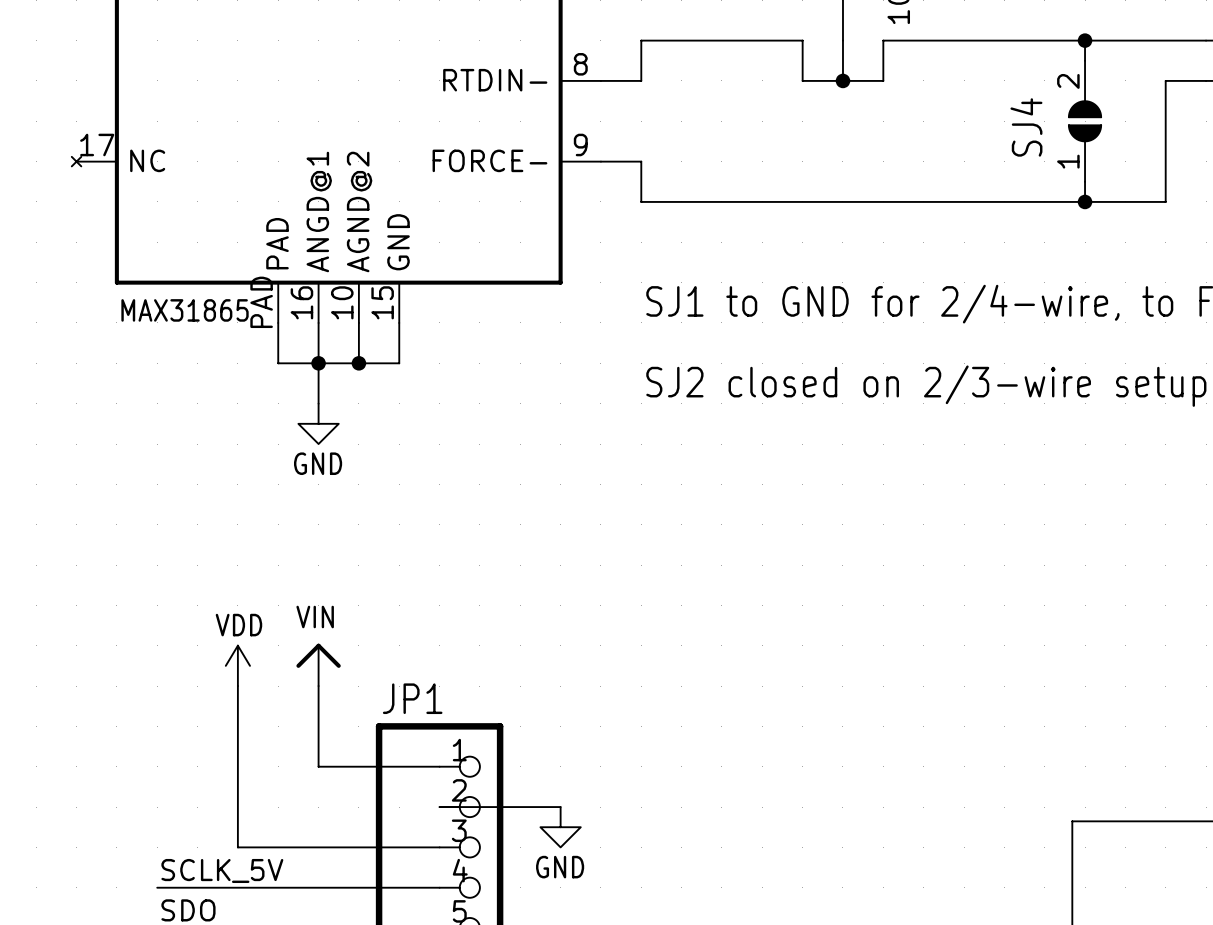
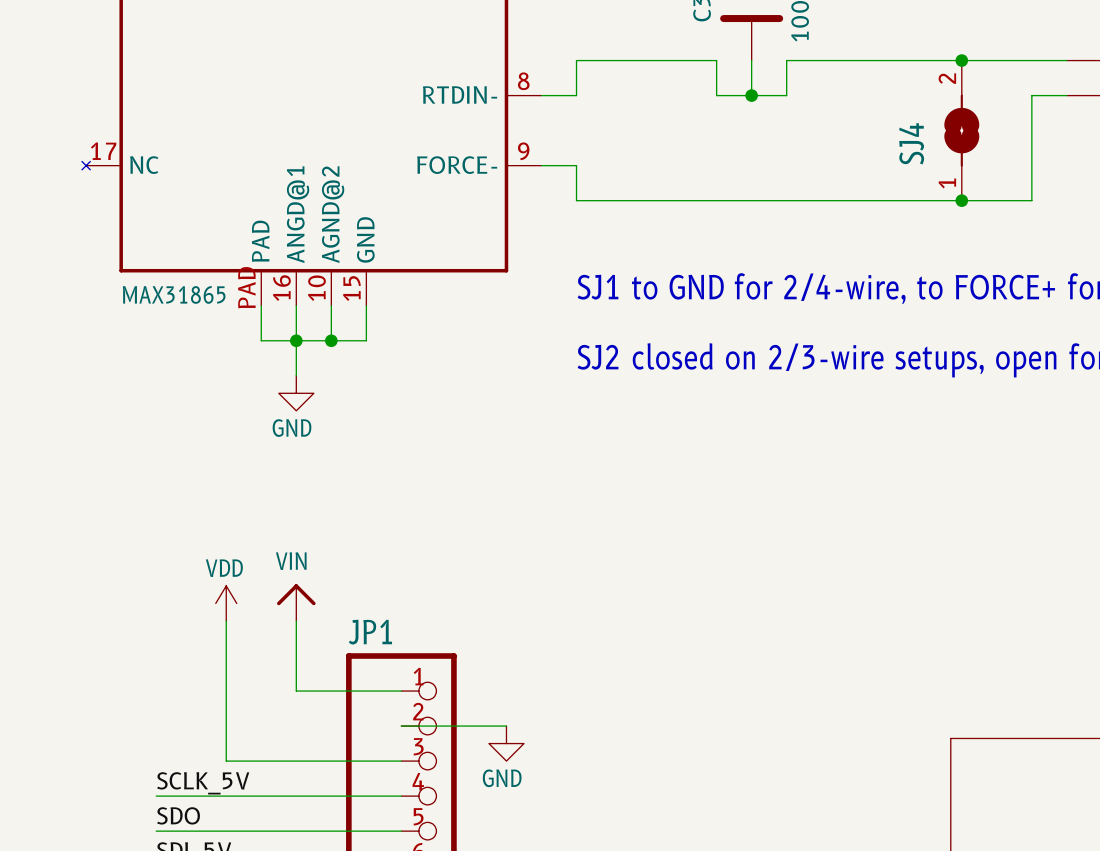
SJ4 symbol: [1068, 60, 1102, 182] -> [944, 60, 980, 201]

